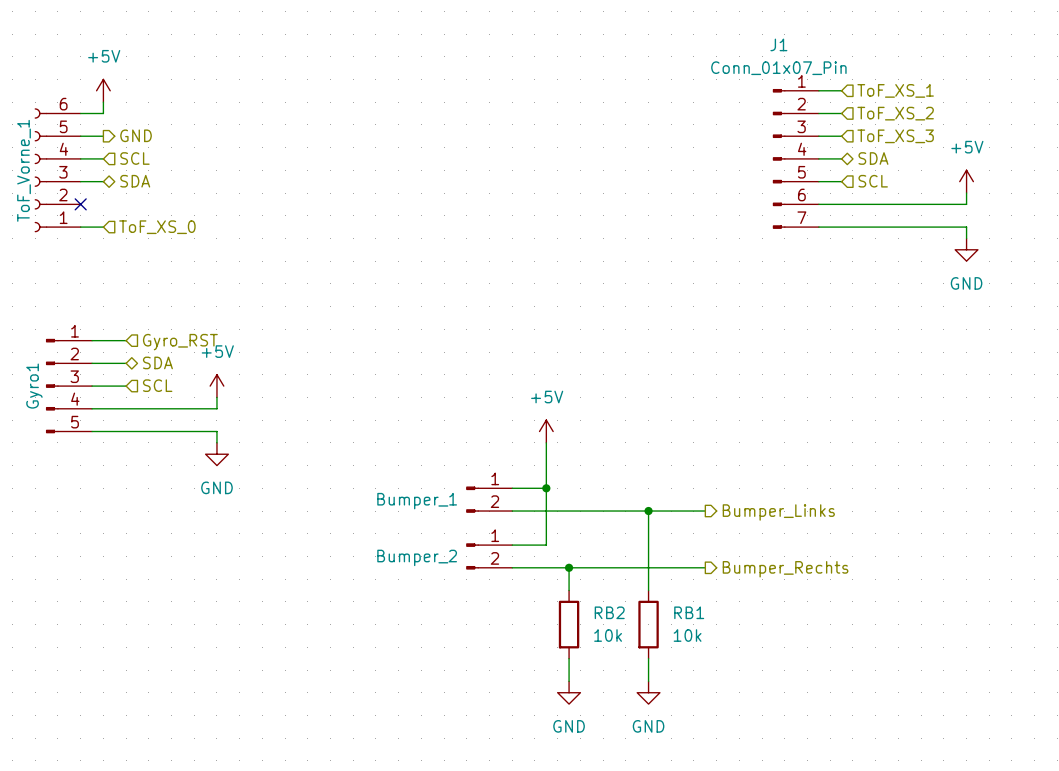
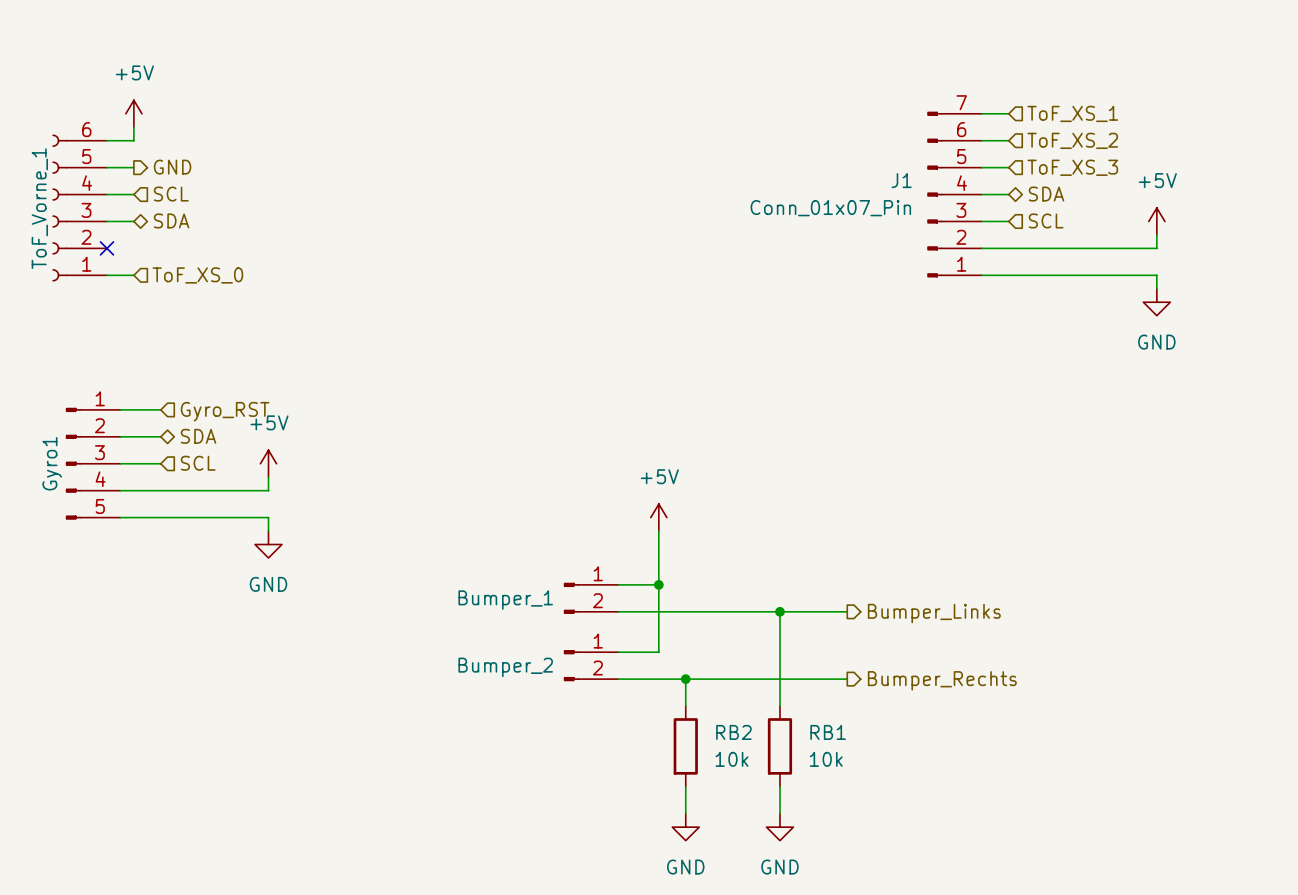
J1 name position: J1 (778, 44) -> J1 (901, 180)
J1 value position: Conn_01x07_Pin (778, 68) -> Conn_01x07_Pin (830, 208)
J1 flip: as is (779, 158) -> up-down (934, 194)

